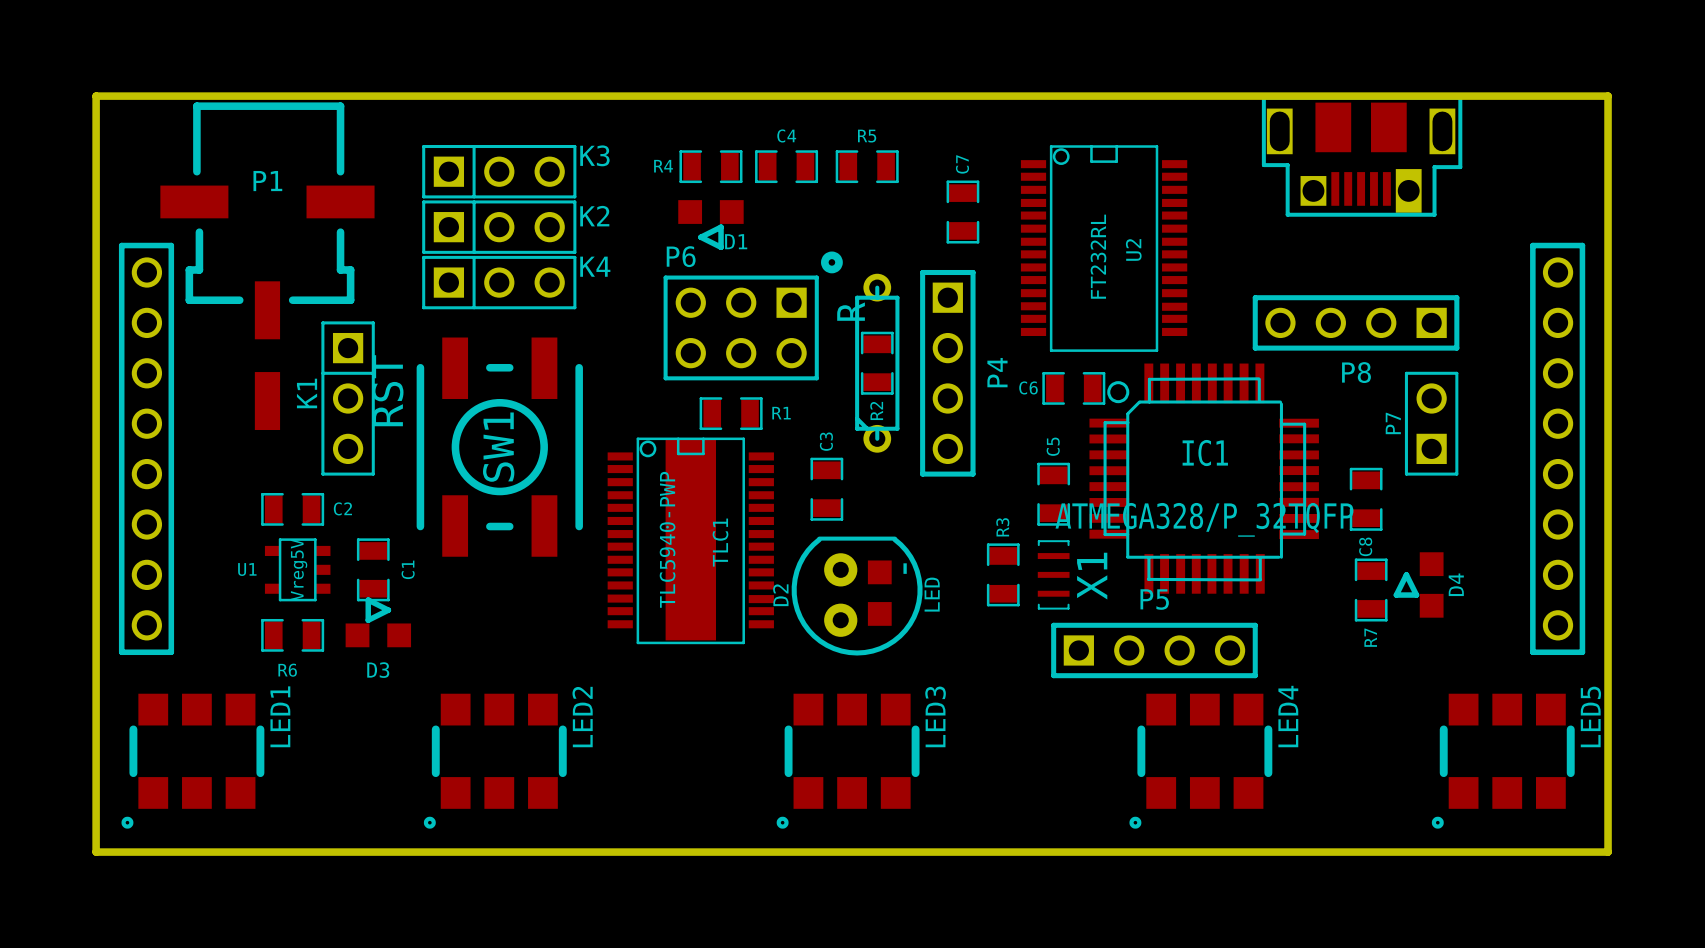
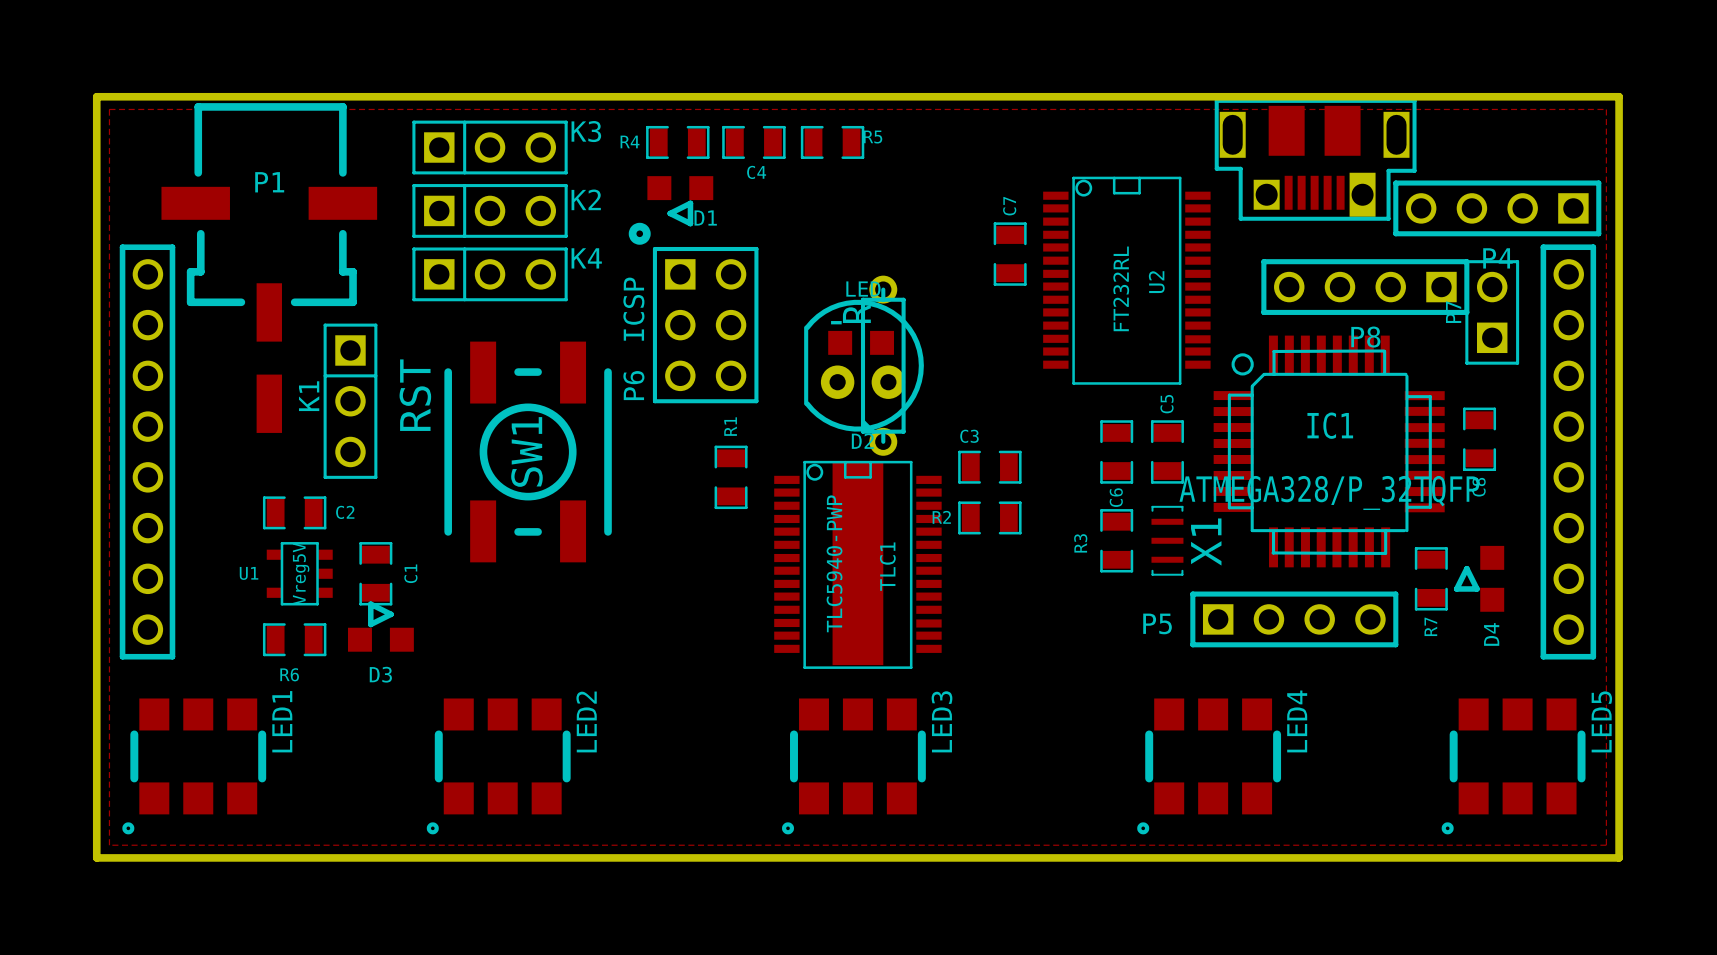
zone outline: none -> (109, 109) (1606, 109) (1606, 845) (109, 845) (109, 109)
C4 name position: C4 (786, 135) -> C4 (756, 172)
part position: (1362, 156) -> (1315, 159)
R4 position: (710, 166) -> (677, 142)
C4 position: (786, 166) -> (753, 142)
R5 position: (867, 166) -> (832, 142)
K3 position: (499, 171) -> (490, 147)
C7 position: (962, 212) -> (1010, 254)
D1 position: (710, 225) -> (680, 201)
K2 position: (499, 227) -> (490, 210)
U2 position: (1104, 248) -> (1126, 280)
K4 position: (499, 282) -> (490, 274)
P6 value: none -> ICSP (633, 309)
P6 rotation: 0° (753, 315) -> 90° counterclockwise (693, 313)
P8 position: (1356, 322) -> (1365, 287)
R2 rotation: 0° (877, 363) -> 90° clockwise (989, 517)
R2 position: (877, 363) -> (989, 517)
P4 rotation: 0° (947, 373) -> 90° clockwise (1497, 208)
P4 position: (947, 373) -> (1497, 208)
C6 name position: C6 (1028, 387) -> C6 (1116, 497)
C6 rotation: 0° (1073, 388) -> 90° clockwise (1116, 451)
C6 position: (1073, 388) -> (1116, 451)
R1 rotation: 0° (731, 413) -> 90° clockwise (731, 477)
R1 position: (731, 413) -> (731, 477)
R1 name position: R1 (781, 413) -> R1 (730, 426)
P7 position: (1431, 423) -> (1492, 312)
SW1 position: (499, 447) -> (528, 451)
IC1 position: (1204, 478) -> (1329, 451)
C3 rotation: 0° (826, 489) -> 90° clockwise (989, 467)
C3 position: (826, 489) -> (989, 467)
C5 position: (1053, 494) -> (1167, 451)
C8 position: (1366, 499) -> (1479, 439)
R3 name position: R3 (1002, 527) -> R3 (1080, 543)
TLC1 position: (690, 540) -> (857, 564)
R3 position: (1003, 574) -> (1116, 540)
X1 position: (1053, 574) -> (1167, 540)
D4 position: (1418, 584) -> (1479, 578)
D4 name position: D4 (1456, 584) -> D4 (1491, 634)
R7 position: (1371, 590) -> (1431, 578)
D2 rotation: 0° (857, 596) -> 90° counterclockwise (864, 365)
D2 position: (857, 596) -> (864, 365)
P5 name position: P5 (1154, 599) -> P5 (1157, 623)
P5 position: (1154, 650) -> (1294, 619)

